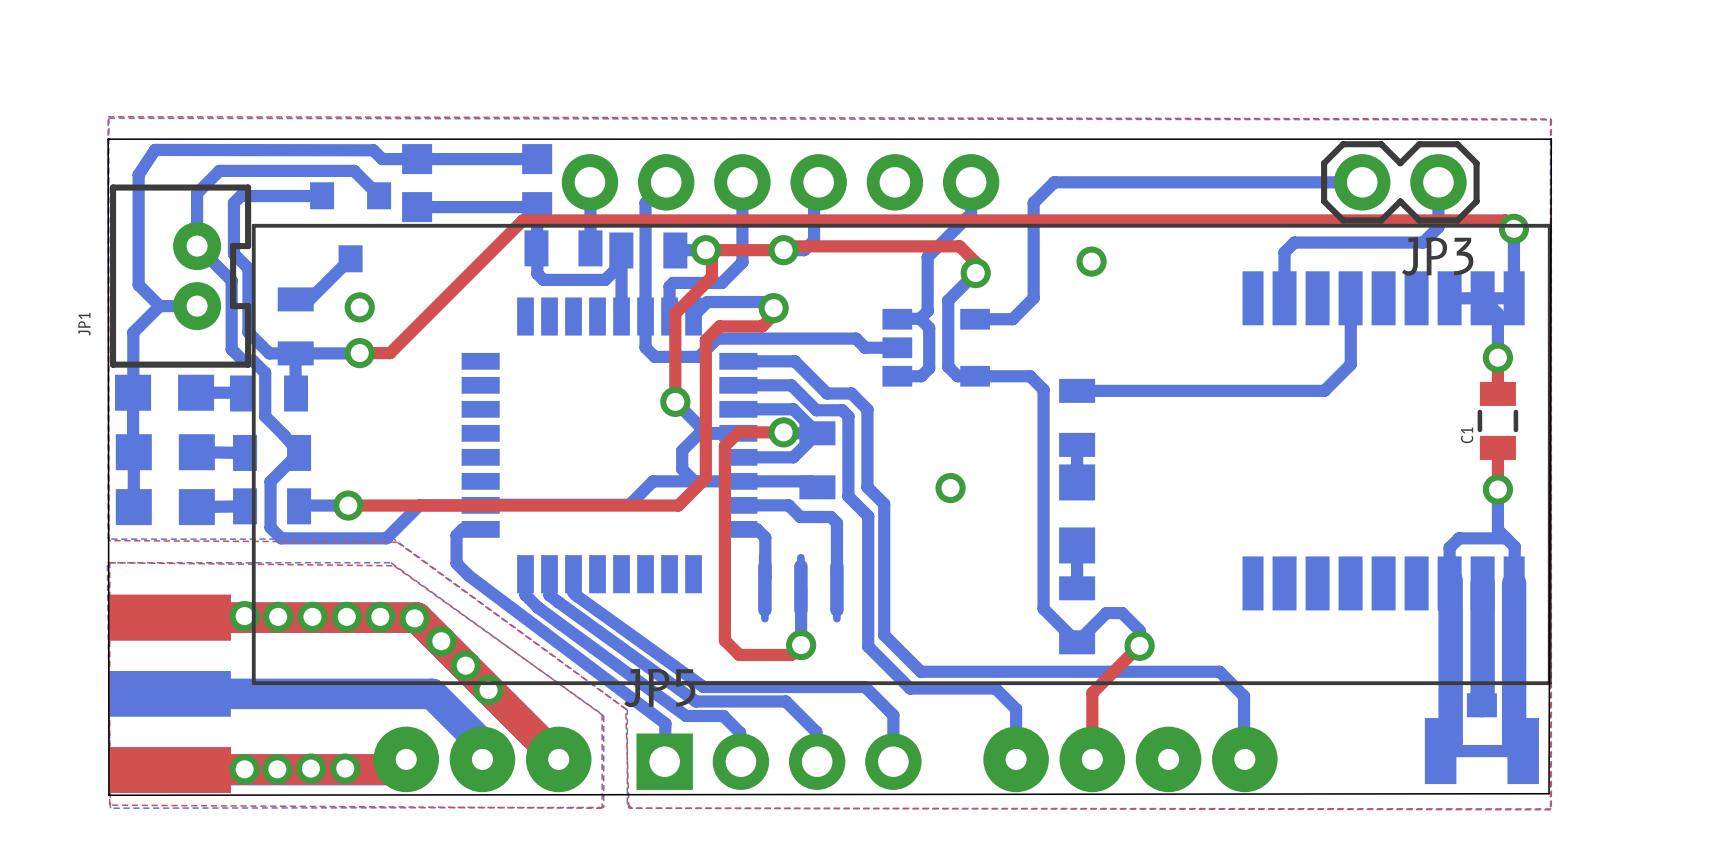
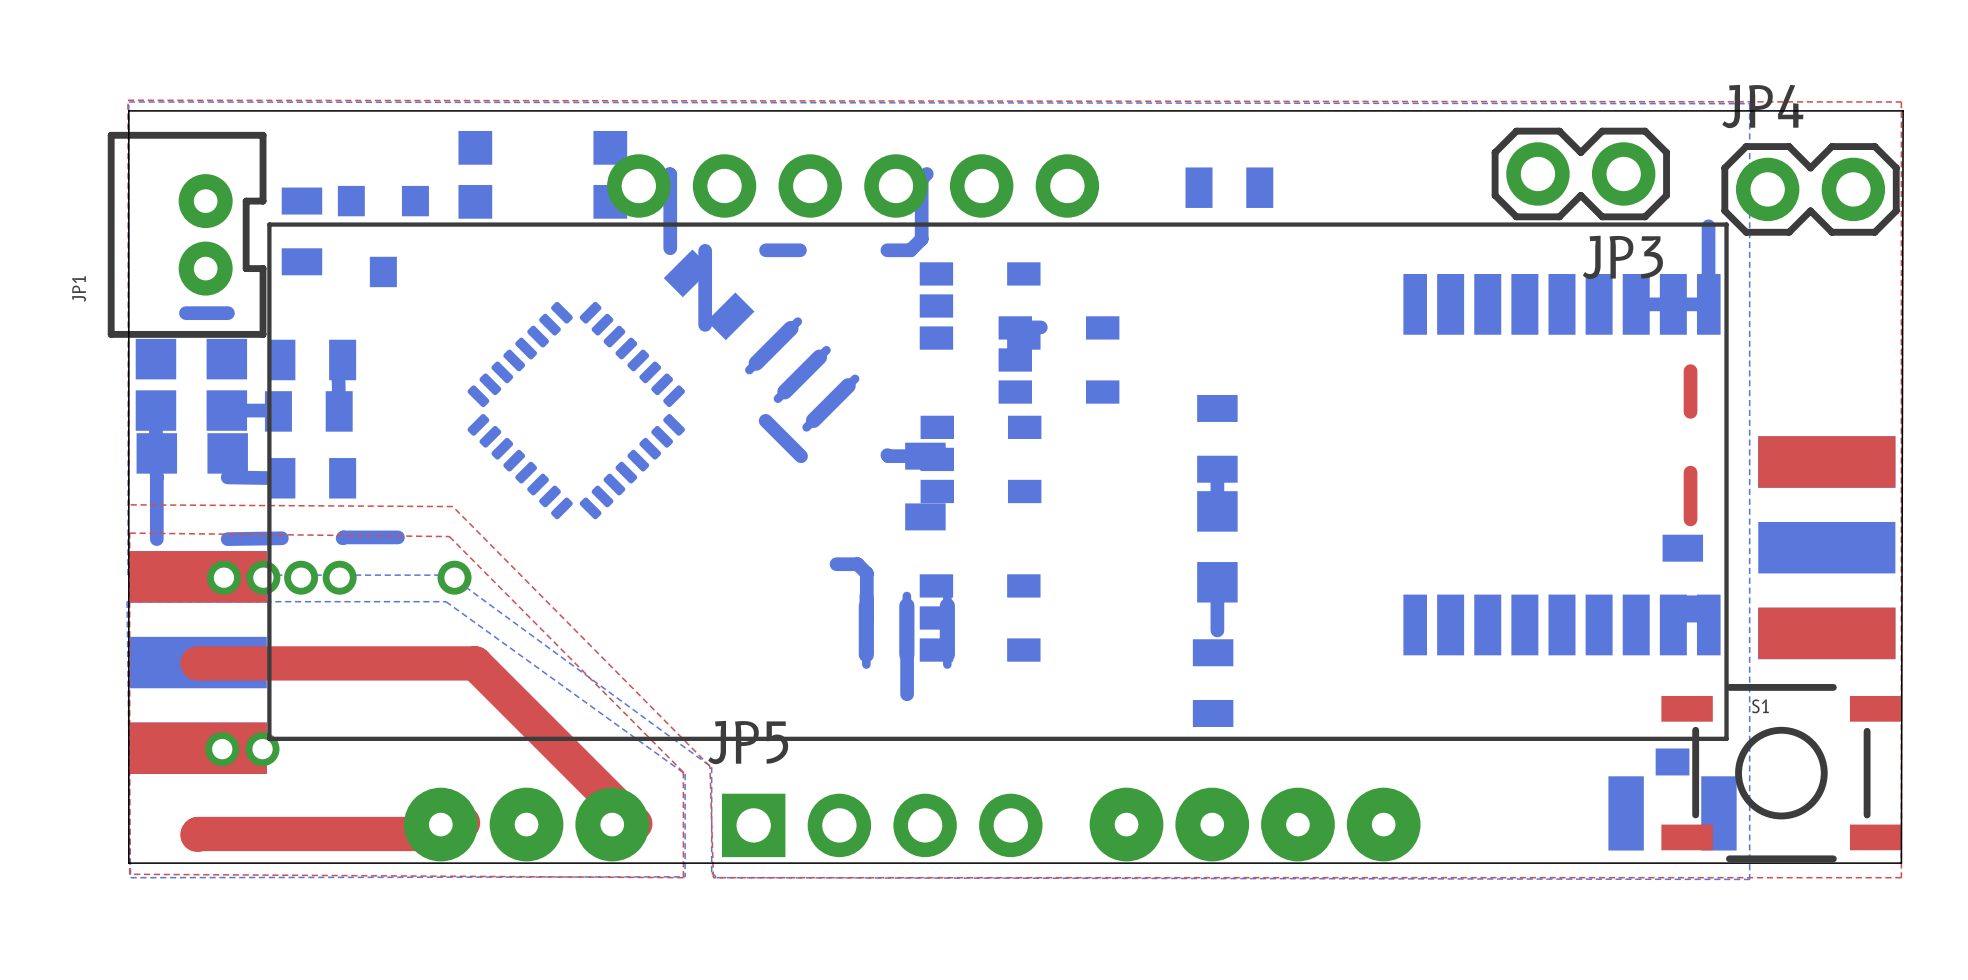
board edge: (108, 139) (1551, 139) (1549, 793) (108, 795) (108, 139) -> (128, 110) (128, 863) (1901, 863) (1903, 110) (128, 110)
bottom track: (537, 159) (382, 159) (373, 150) (155, 149) (138, 174) (138, 285) (159, 306) (133, 332) (133, 392) -> none
bottom track: (666, 182) (645, 202) (645, 347) (654, 356) (698, 356) (717, 338) (856, 338) (865, 347) (897, 347) -> none
bottom track: (742, 182) (742, 262) (721, 282) (673, 282) (669, 286) (669, 316) -> none
part position: (780, 182) -> (853, 185)
bottom track: (971, 182) (971, 213) (927, 257) (927, 311) (920, 318) (929, 327) (929, 368) (921, 376) (897, 376) -> none
bottom track: (1362, 182) (1054, 182) (1033, 202) (1033, 298) (1012, 319) (975, 319) -> none
bottom track: (1438, 182) (1438, 227) (1423, 242) (1294, 242) (1284, 252) (1284, 298) -> none
bottom track: (379, 195) (354, 170) (219, 170) (197, 193) (197, 246) (231, 280) (231, 349) (243, 360) (253, 360) (265, 372) (265, 416) (299, 452) (270, 481) (270, 527) (281, 538) (386, 538) (419, 505) (629, 504) (653, 481) (811, 481) (817, 487) -> none
bottom track: (321, 196) (240, 196) (233, 202) (233, 253) (248, 268) (248, 332) (269, 353) (359, 353) -> none
JP4: none -> (1810, 189)
bottom track: (417, 207) (537, 207) (537, 273) (543, 279) (605, 279) (621, 263) (621, 250) -> none
part position: (350, 227) -> (383, 236)
top track: (1513, 228) (1505, 220) (522, 220) (390, 353) (359, 353) -> none
via: (1513, 228) -> none
part: none -> (301, 231)
part: (563, 248) -> none
part: (648, 250) -> none
via: (705, 250) -> none
via: (783, 250) -> none
bottom track: (350, 258) (308, 300) -> none
via: (1091, 261) -> none
bottom track: (975, 273) (948, 300) (948, 366) (957, 376) (1030, 376) (1043, 389) (1043, 608) (1077, 642) (1106, 613) (1122, 613) (1139, 630) (1139, 645) -> none
top track: (975, 273) (975, 262) (959, 246) (787, 246) (783, 250) (705, 250) (711, 256) (711, 276) (675, 313) (675, 401) -> none
via: (975, 273) -> none
JP1 position: (180, 276) -> (187, 234)
part: none -> (709, 294)
bottom track: (1350, 298) (1350, 364) (1324, 390) (1077, 390) -> none
bottom track: (1482, 298) (1497, 313) (1497, 357) -> none
part: none -> (980, 305)
via: (359, 307) -> none
bottom track: (773, 308) (767, 302) (707, 302) (693, 316) -> none
top track: (773, 308) (773, 314) (762, 326) (719, 326) (705, 340) (705, 478) (678, 505) (348, 505) -> none
via: (773, 308) -> none
part rotation: 0° (295, 326) -> 90° clockwise (312, 359)
via: (359, 353) -> none
via: (1497, 357) -> none
part: none -> (802, 374)
bottom track: (738, 361) (794, 361) (827, 393) (851, 393) (867, 409) (867, 487) (884, 504) (884, 635) (920, 671) (1219, 671) (1244, 696) (1244, 759) -> none
bottom track: (738, 385) (791, 385) (816, 410) (842, 410) (848, 416) (848, 496) (868, 516) (868, 646) (910, 688) (995, 688) (1016, 709) (1016, 759) -> none
part: none -> (576, 410)
via: (675, 401) -> none
bottom track: (738, 409) (793, 409) (817, 433) (793, 457) (737, 458) -> none
C1 side: top (1497, 420) -> bottom (1229, 187)
top track: (783, 432) (738, 432) (724, 446) (724, 640) (739, 654) (791, 654) (801, 645) -> none
via: (783, 432) -> none
bottom track: (738, 433) (699, 433) (682, 450) (682, 469) (694, 481) -> none
part: none -> (980, 459)
part: (609, 445) -> none
part position: (165, 452) -> (192, 453)
via: (950, 488) -> none
bottom track: (1497, 489) (1497, 529) (1514, 546) (1514, 742) (1523, 751) (1440, 751) (1450, 741) (1450, 580) -> none
via: (1497, 489) -> none
via: (348, 505) -> none
bottom track: (738, 505) (788, 505) (800, 516) (830, 516) (836, 523) (836, 588) -> none
part: (272, 506) -> none
part position: (165, 507) -> (191, 359)
part position: (901, 508) -> (997, 541)
part: none -> (1826, 547)
bottom track: (480, 529) (462, 529) (456, 535) (456, 563) (468, 575) (665, 723) (664, 761) -> none
bottom track: (1506, 538) (1459, 538) (1449, 547) (1449, 583) -> none
via: none -> (223, 577)
via: none -> (263, 577)
via: none -> (301, 577)
via: none -> (339, 577)
via: none -> (454, 577)
part: none -> (1682, 578)
top zone outline: (109, 562) (394, 565) (602, 714) -> (129, 601) (129, 533) (449, 536) (683, 772)
bottom track: (525, 574) (525, 595) (538, 607) (686, 715) (723, 715) (740, 732) (740, 761) -> none
bottom track: (549, 574) (549, 595) (695, 701) (785, 701) (816, 731) (817, 761) -> none
bottom track: (573, 574) (573, 592) (576, 595) (703, 687) (865, 687) (893, 715) (893, 761) -> none
part: none -> (980, 617)
bottom track: (1482, 583) (1481, 705) -> none
part position: (1077, 615) -> (1213, 683)
via: (244, 616) -> none
via: (278, 616) -> none
via: (312, 616) -> none
via: (346, 616) -> none
via: (380, 616) -> none
via: (414, 618) -> none
via: (441, 641) -> none
via: (801, 645) -> none
top track: (1139, 645) (1092, 693) (1092, 759) -> none
via: (1139, 645) -> none
via: (465, 665) -> none
via: (488, 690) -> none
bottom track: (169, 693) (432, 693) (482, 744) (482, 759) -> none
part position: (169, 693) -> (198, 662)
via: none -> (222, 749)
via: none -> (262, 749)
top zone outline: (625, 709) (397, 542) (108, 540) (108, 116) (1551, 119) (1551, 808) (628, 808) -> (709, 766) (452, 506) (128, 504) (127, 100) (1901, 101) (1901, 877) (713, 877)
S1: none -> (1781, 773)
via: (310, 768) -> none
via: (345, 768) -> none
via: (244, 769) -> none
via: (277, 769) -> none

